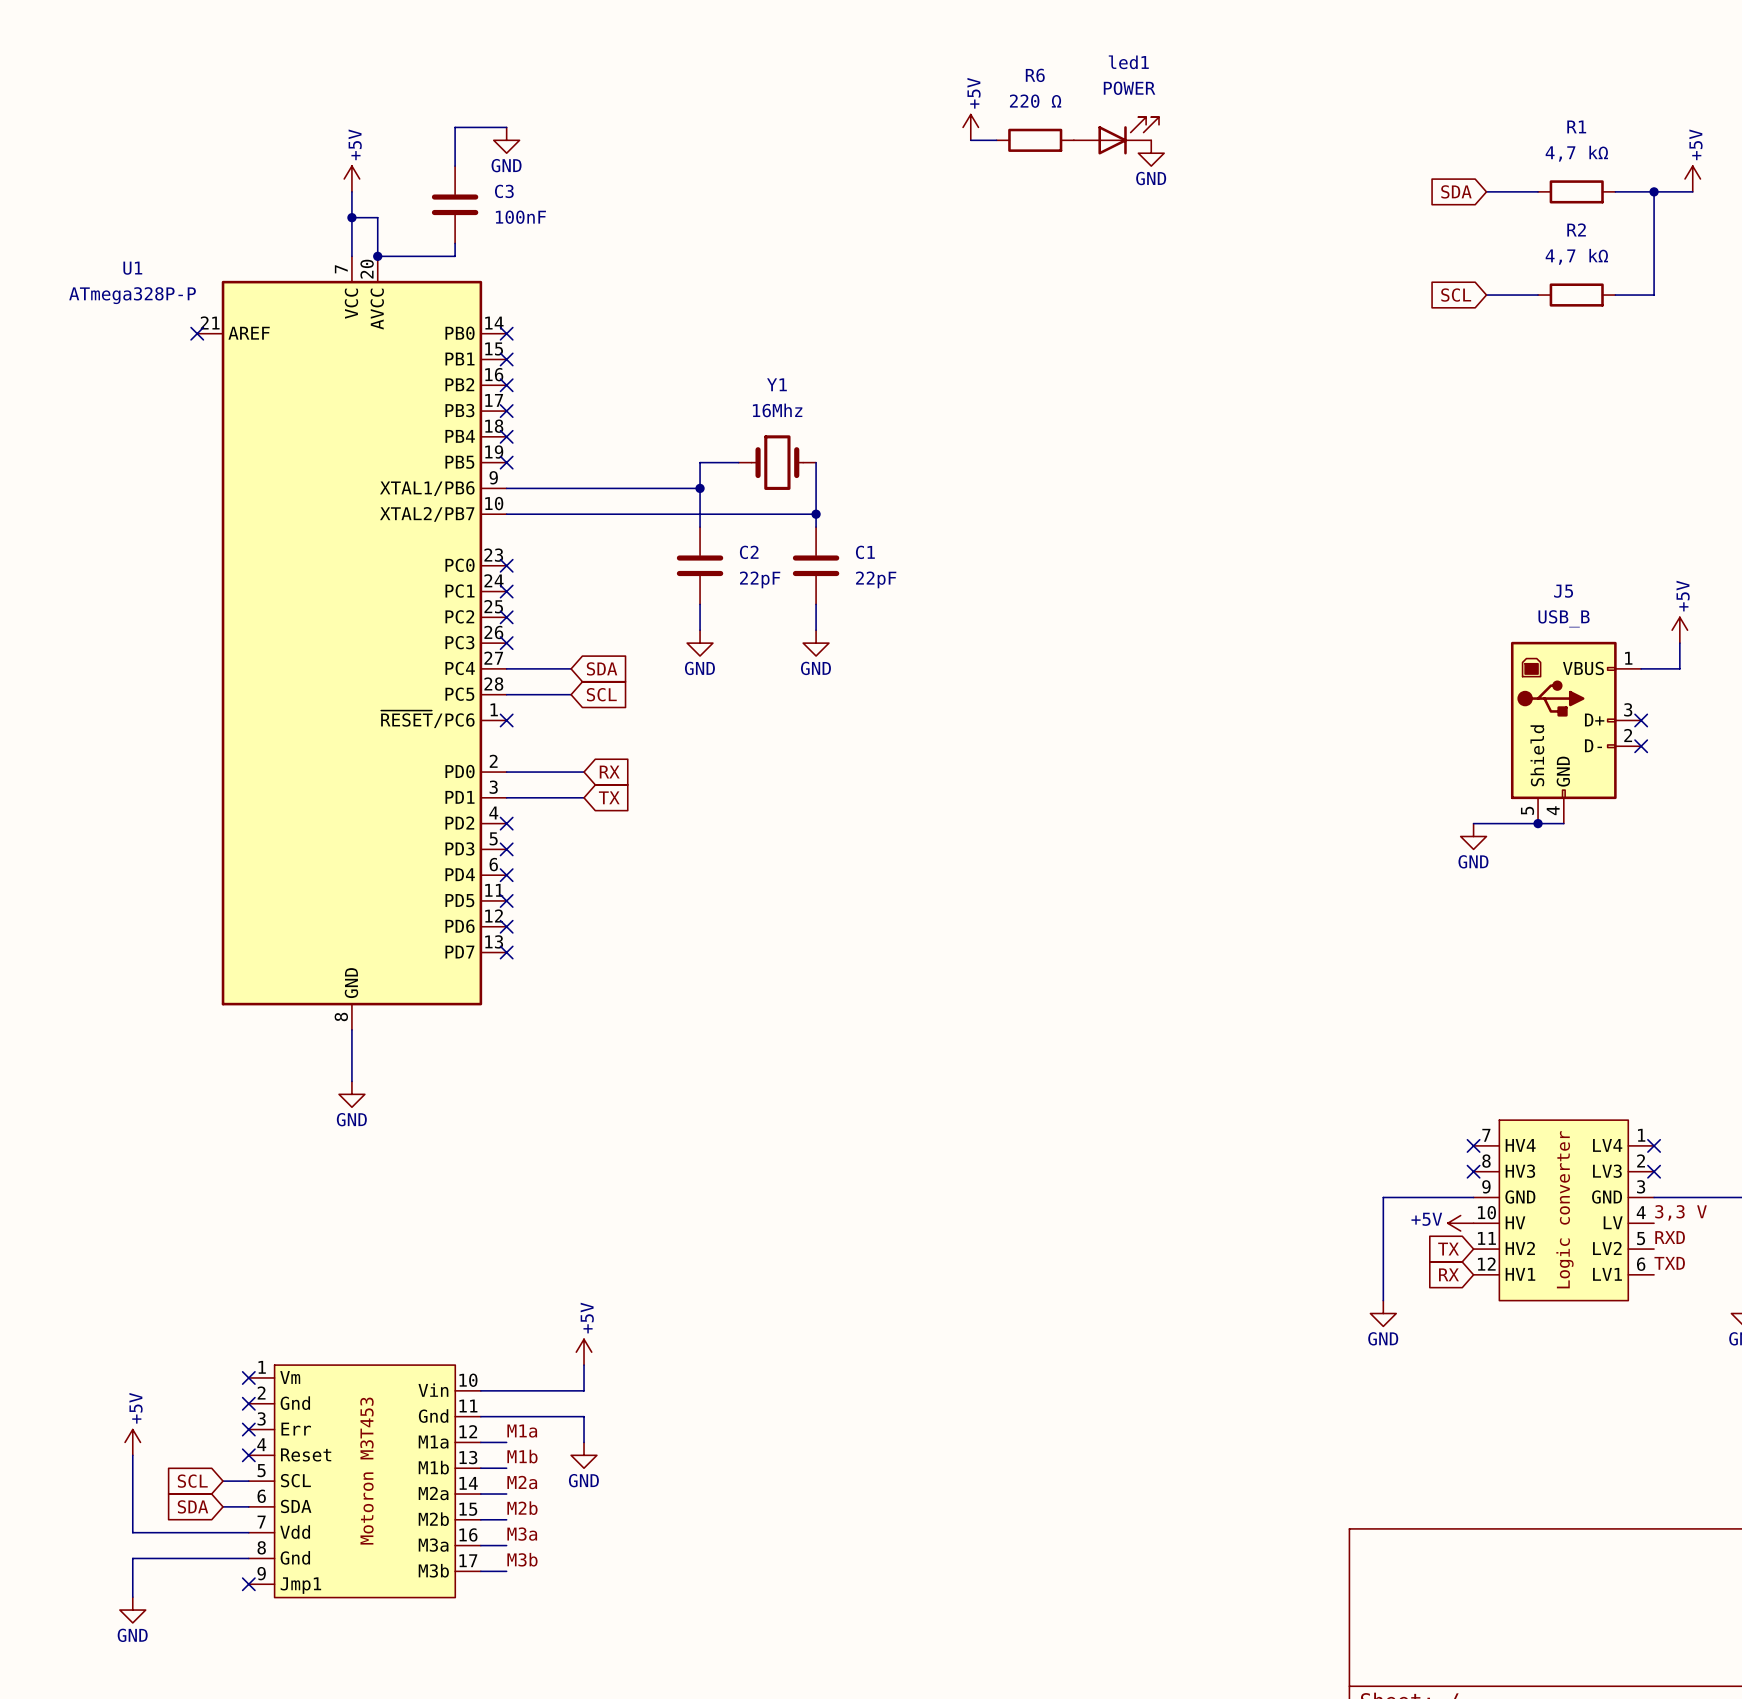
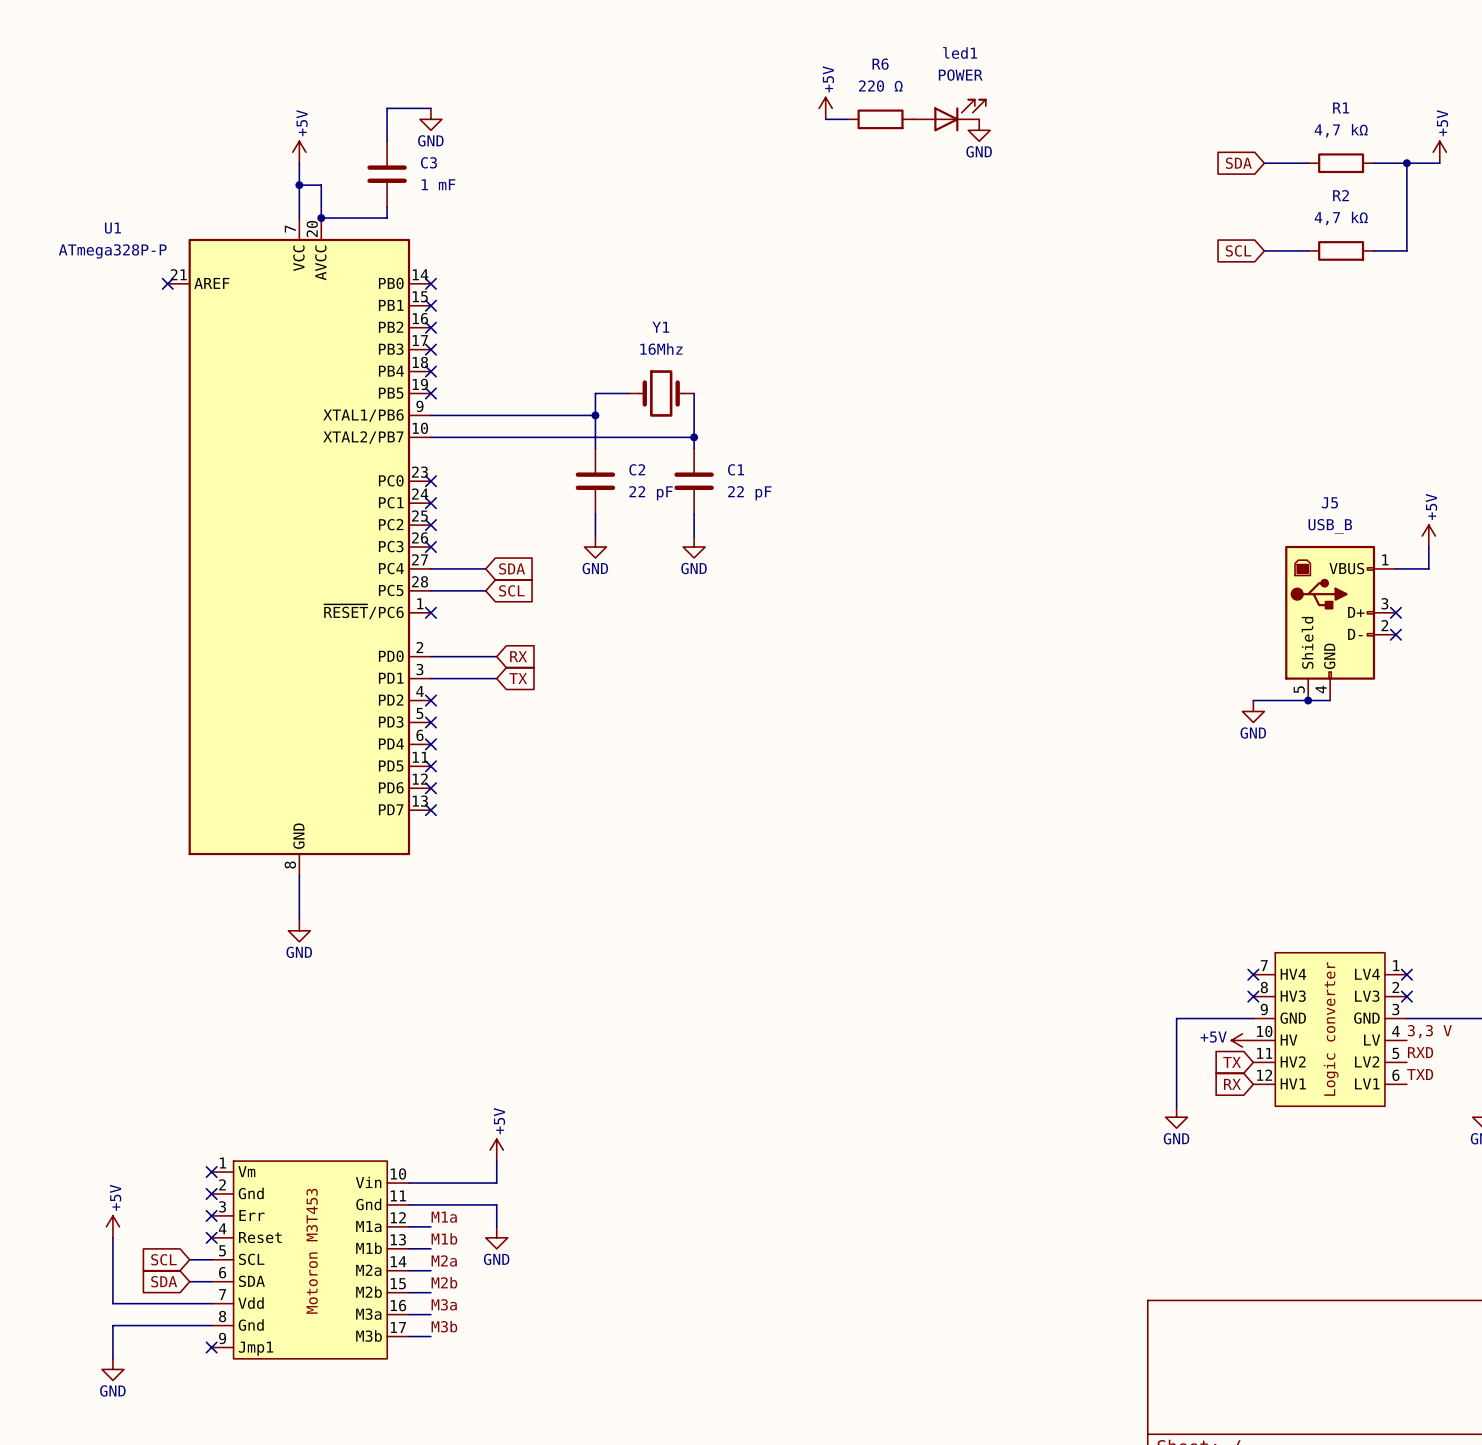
C3 value: 100nF (520, 217) -> 1 mF (438, 184)
C2 value: 22pF (760, 579) -> 22 pF (651, 493)
C1 value: 22pF (876, 579) -> 22 pF (749, 493)

